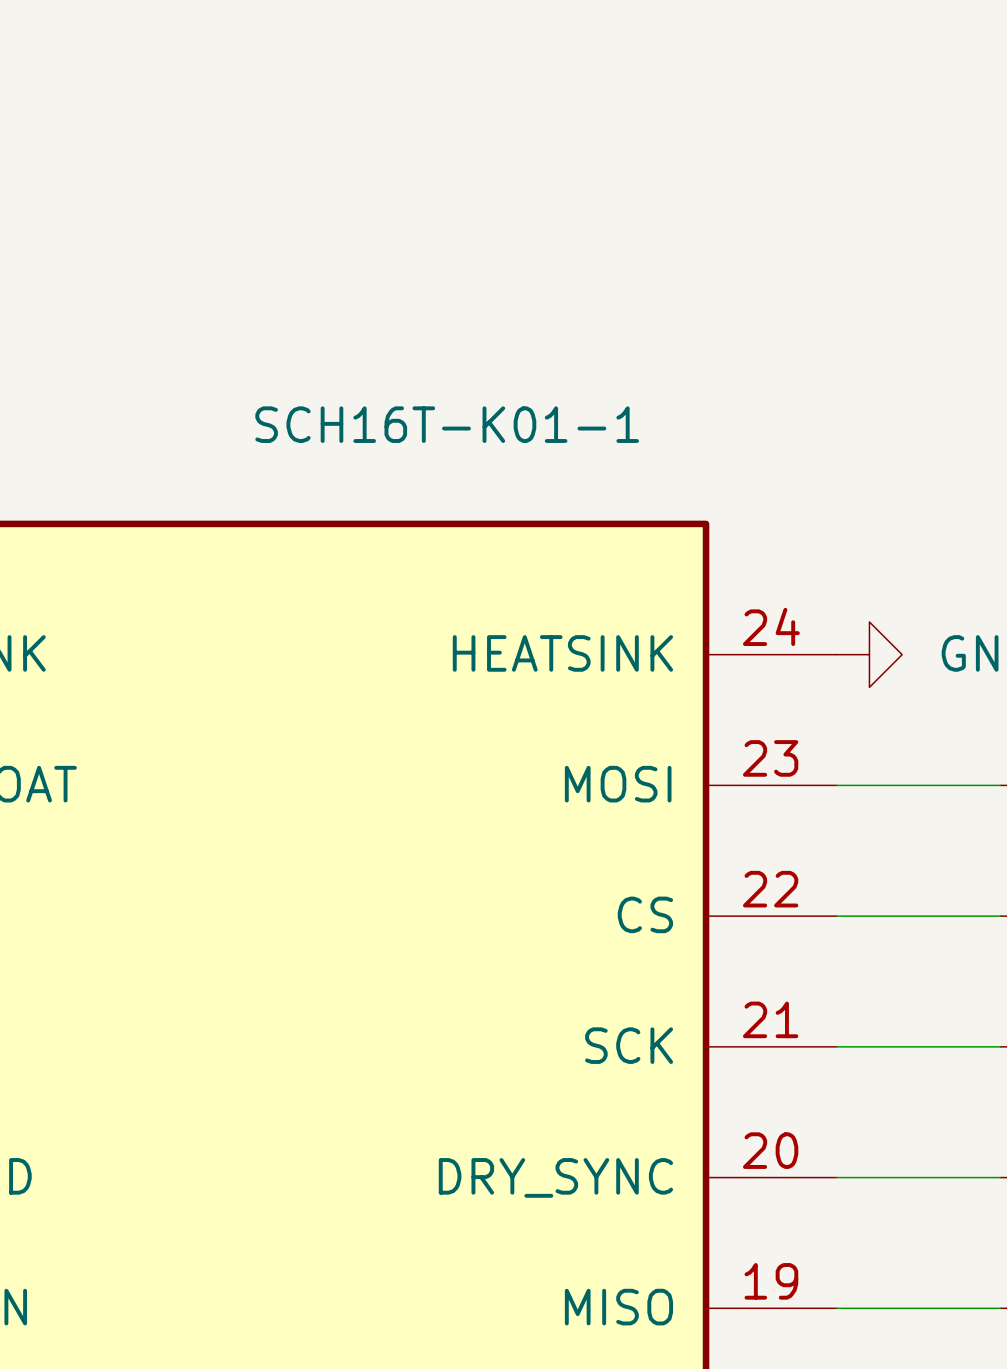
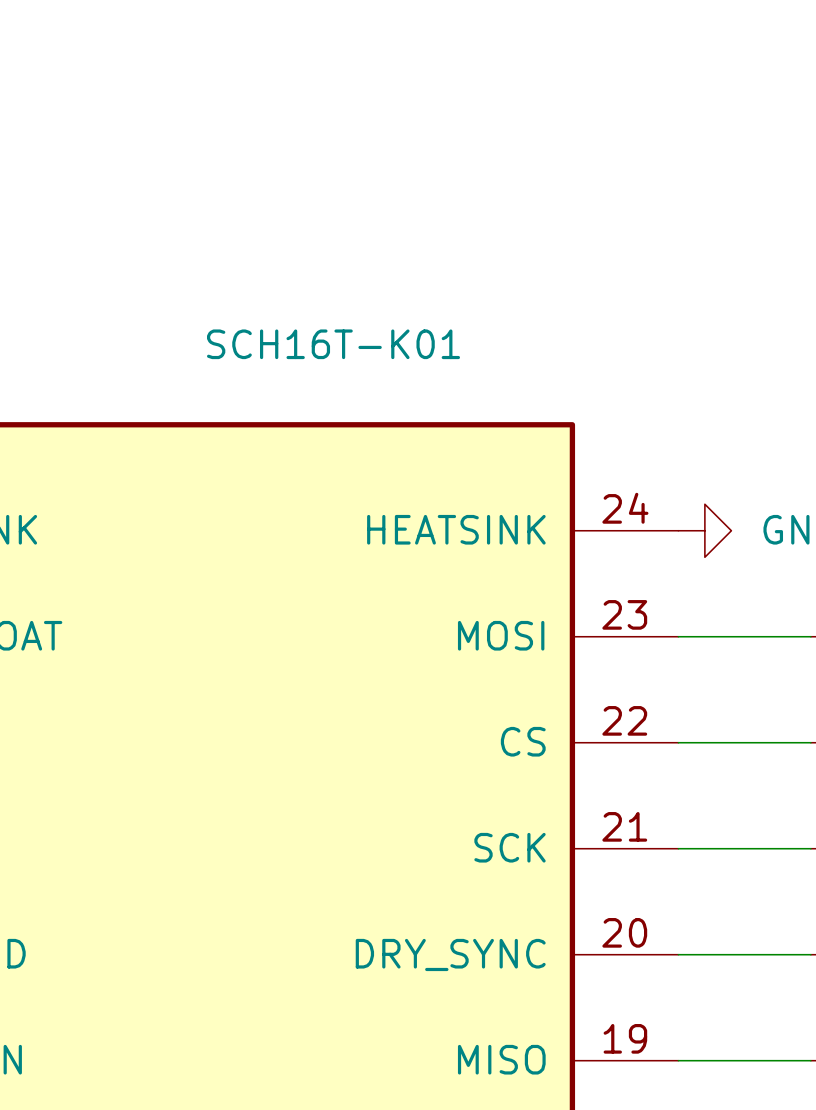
part value: SCH16T-K01-1 (447, 424) -> SCH16T-K01 (333, 344)

